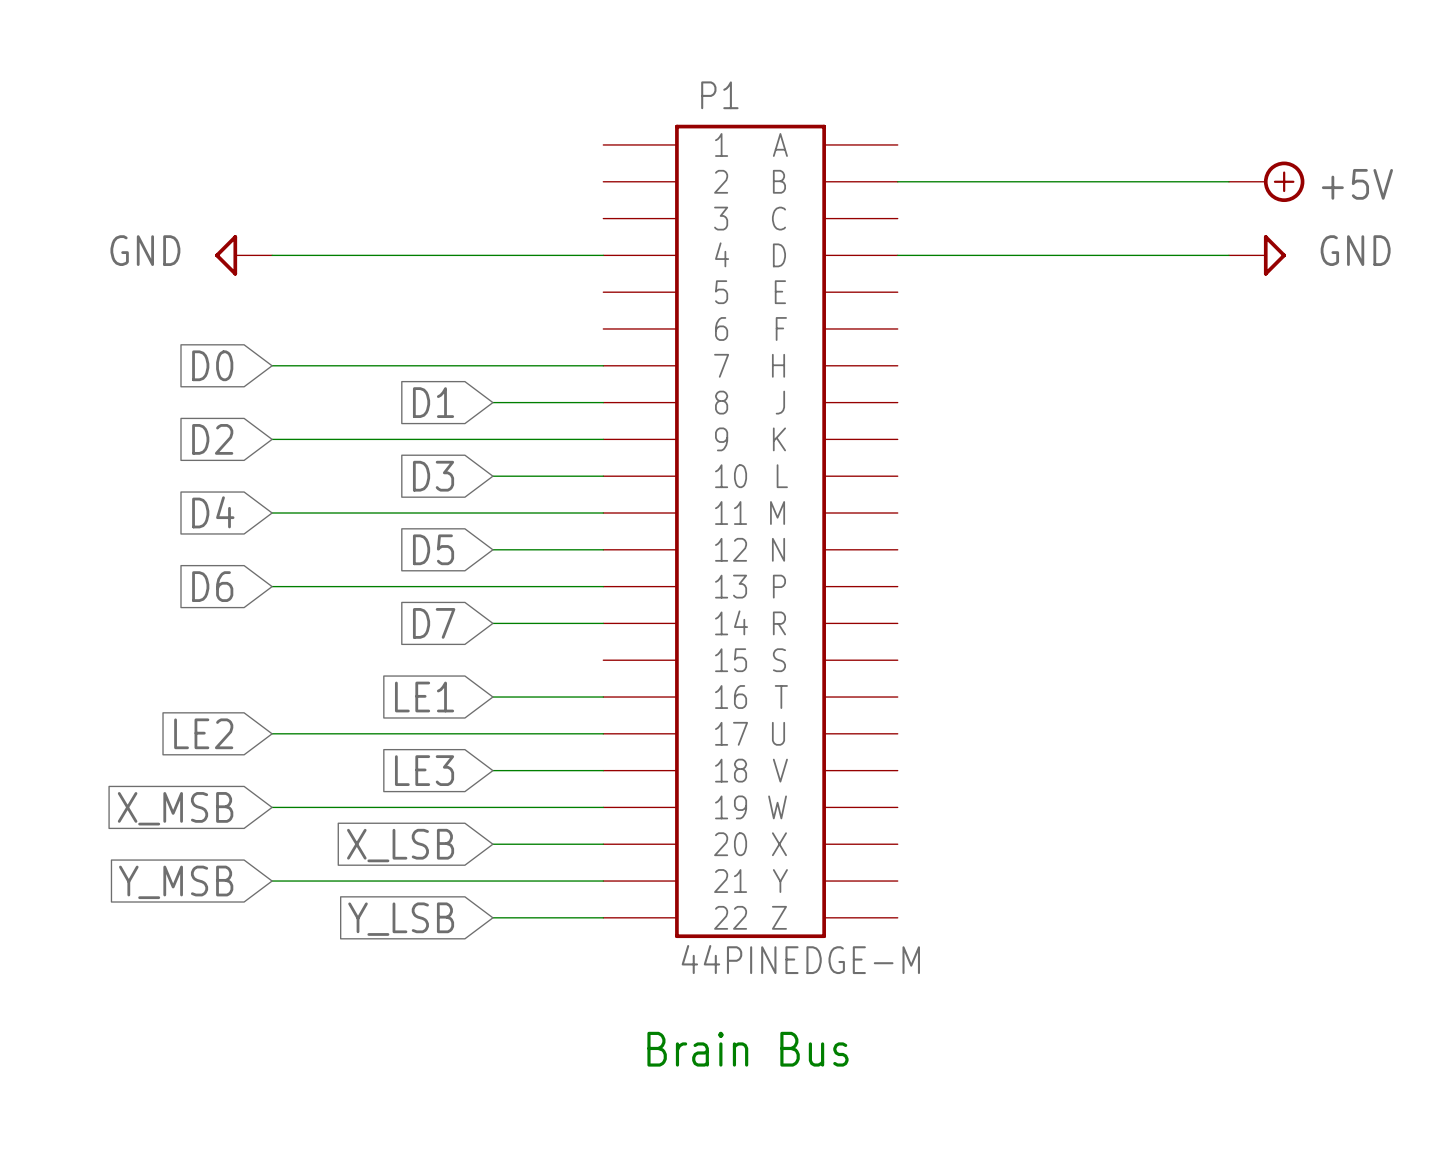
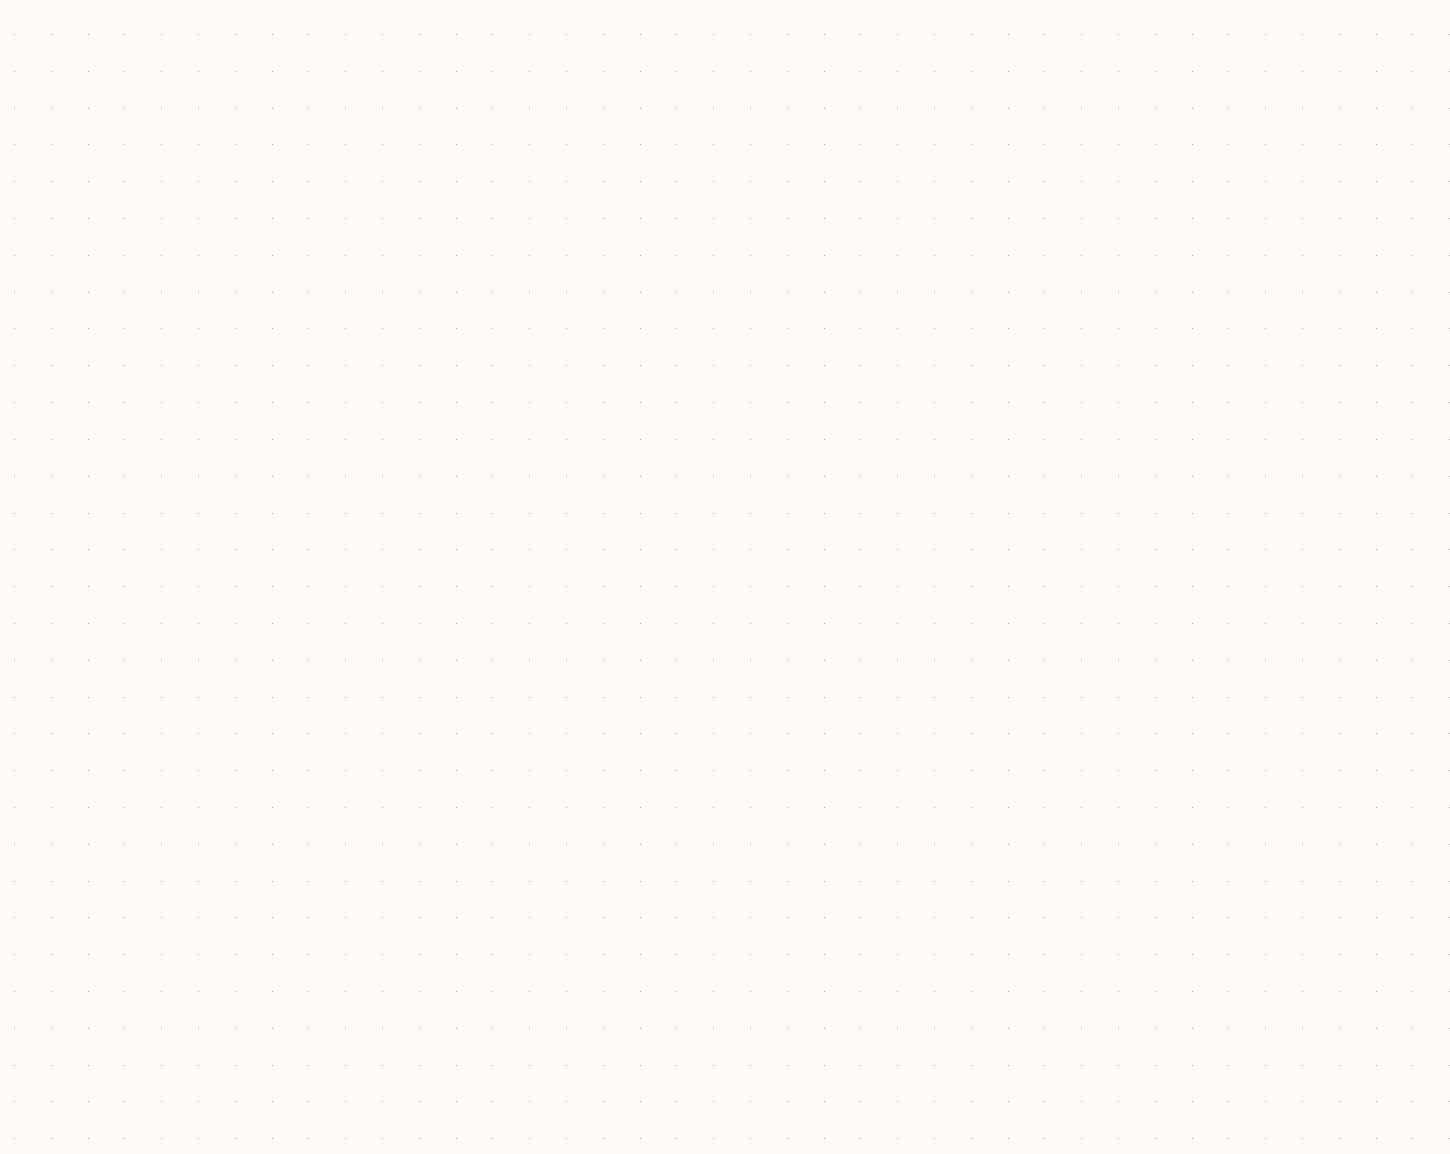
wire: (897, 181) (1228, 181) -> none
power symbol: +5V (1266, 181) -> none
power symbol: GND (243, 255) -> none
wire: (272, 255) (603, 255) -> none
wire: (897, 255) (1228, 255) -> none
power symbol: GND (1257, 255) -> none
global label: D0 (212, 365) -> none
wire: (272, 365) (603, 365) -> none
global label: D1 (433, 402) -> none
wire: (492, 402) (603, 402) -> none
global label: D2 (212, 439) -> none
wire: (272, 439) (603, 439) -> none
global label: D3 (433, 476) -> none
wire: (492, 476) (603, 476) -> none
global label: D4 (213, 512) -> none
wire: (272, 513) (603, 513) -> none
P1: 44PINEDGE-M (750, 531) -> none
global label: D5 (433, 549) -> none
wire: (492, 549) (603, 549) -> none
global label: D6 (212, 586) -> none
wire: (272, 586) (603, 586) -> none
global label: D7 (434, 623) -> none
wire: (492, 623) (603, 623) -> none
global label: LE1 (424, 697) -> none
wire: (492, 697) (603, 697) -> none
global label: LE2 (203, 733) -> none
wire: (272, 733) (603, 733) -> none
global label: LE3 (424, 770) -> none
wire: (492, 770) (603, 770) -> none
wire: (272, 807) (603, 807) -> none
global label: X_MSB (175, 808) -> none
wire: (492, 844) (603, 844) -> none
global label: X_LSB (400, 845) -> none
wire: (272, 881) (603, 881) -> none
global label: Y_MSB (176, 882) -> none
wire: (492, 917) (603, 917) -> none
global label: Y_LSB (401, 919) -> none
text: Brain Bus (748, 1049) -> none

